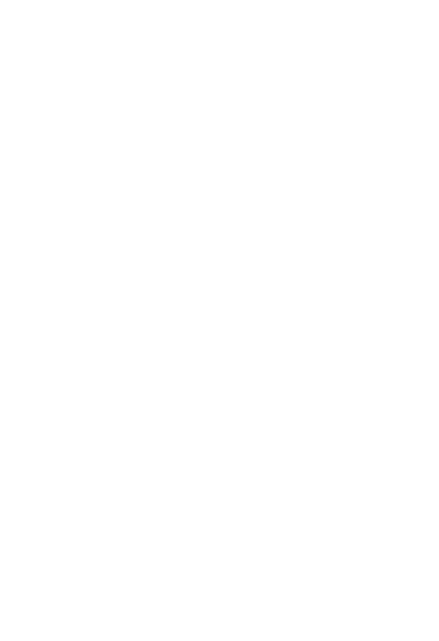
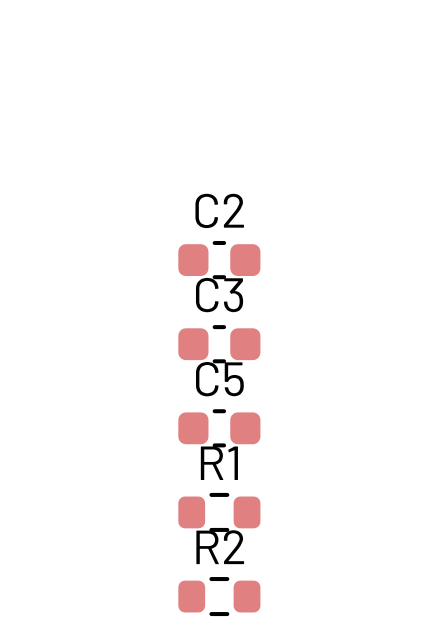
C2: none -> (219, 260)
C3: none -> (219, 344)
C5: none -> (219, 428)
R1: none -> (219, 512)
R2: none -> (219, 596)

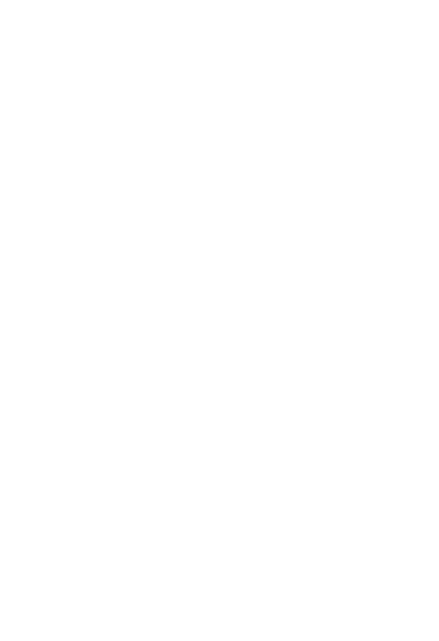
C2: (219, 260) -> none
C3: (219, 344) -> none
C5: (219, 428) -> none
R1: (219, 512) -> none
R2: (219, 596) -> none

